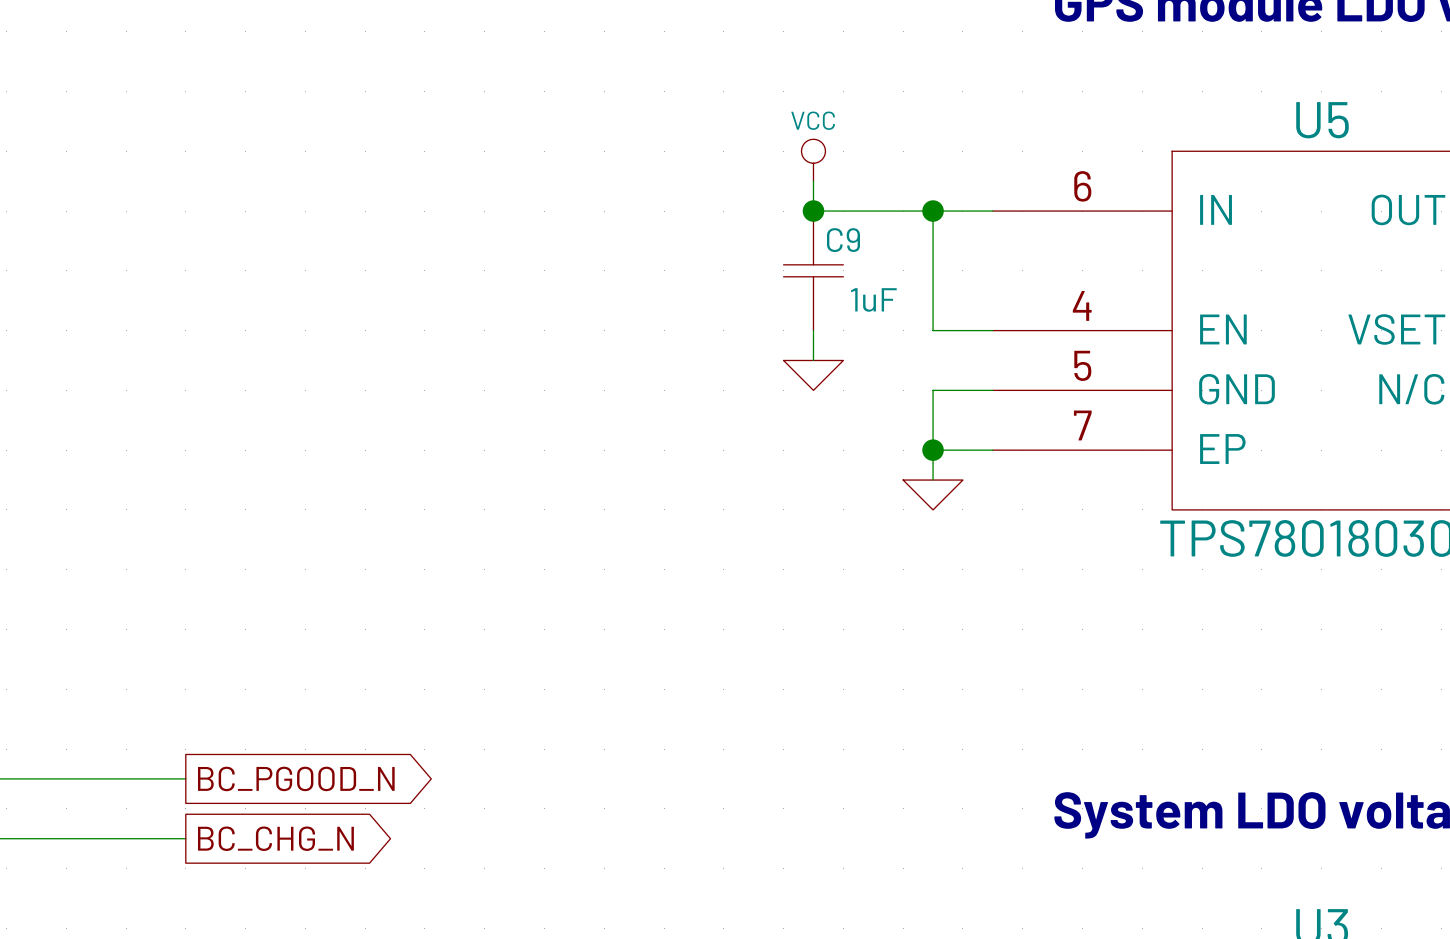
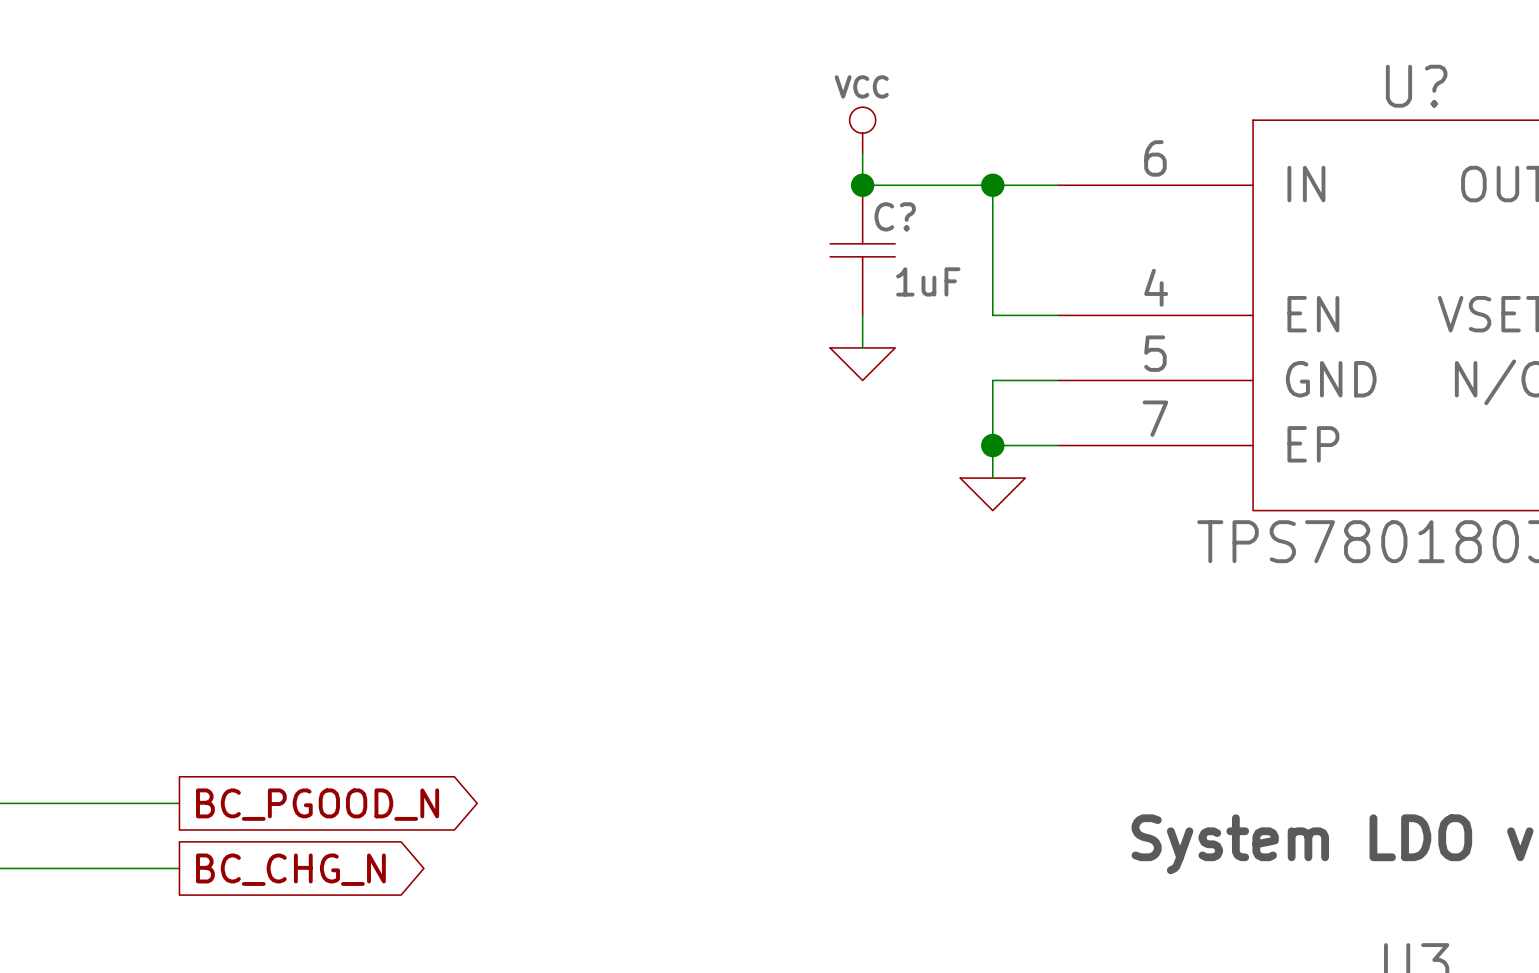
U5 name: U5 (1322, 120) -> U? (1416, 86)
C9 name: C9 (843, 240) -> C? (895, 216)

